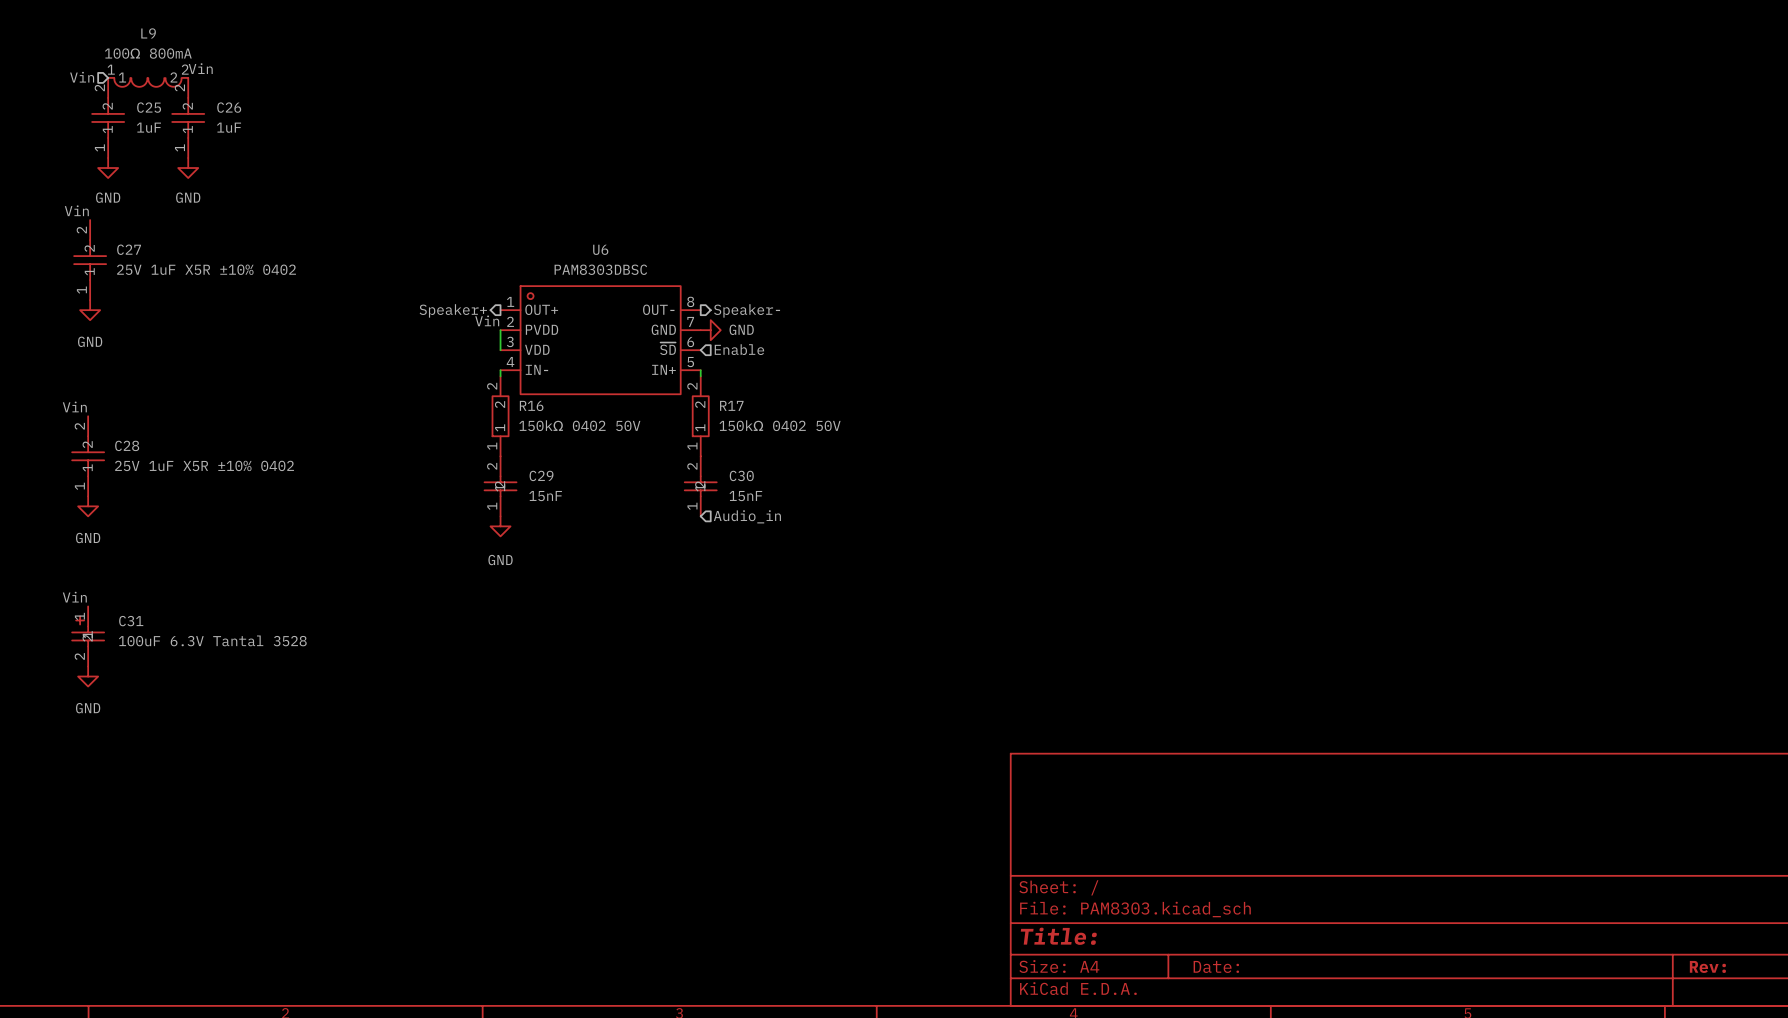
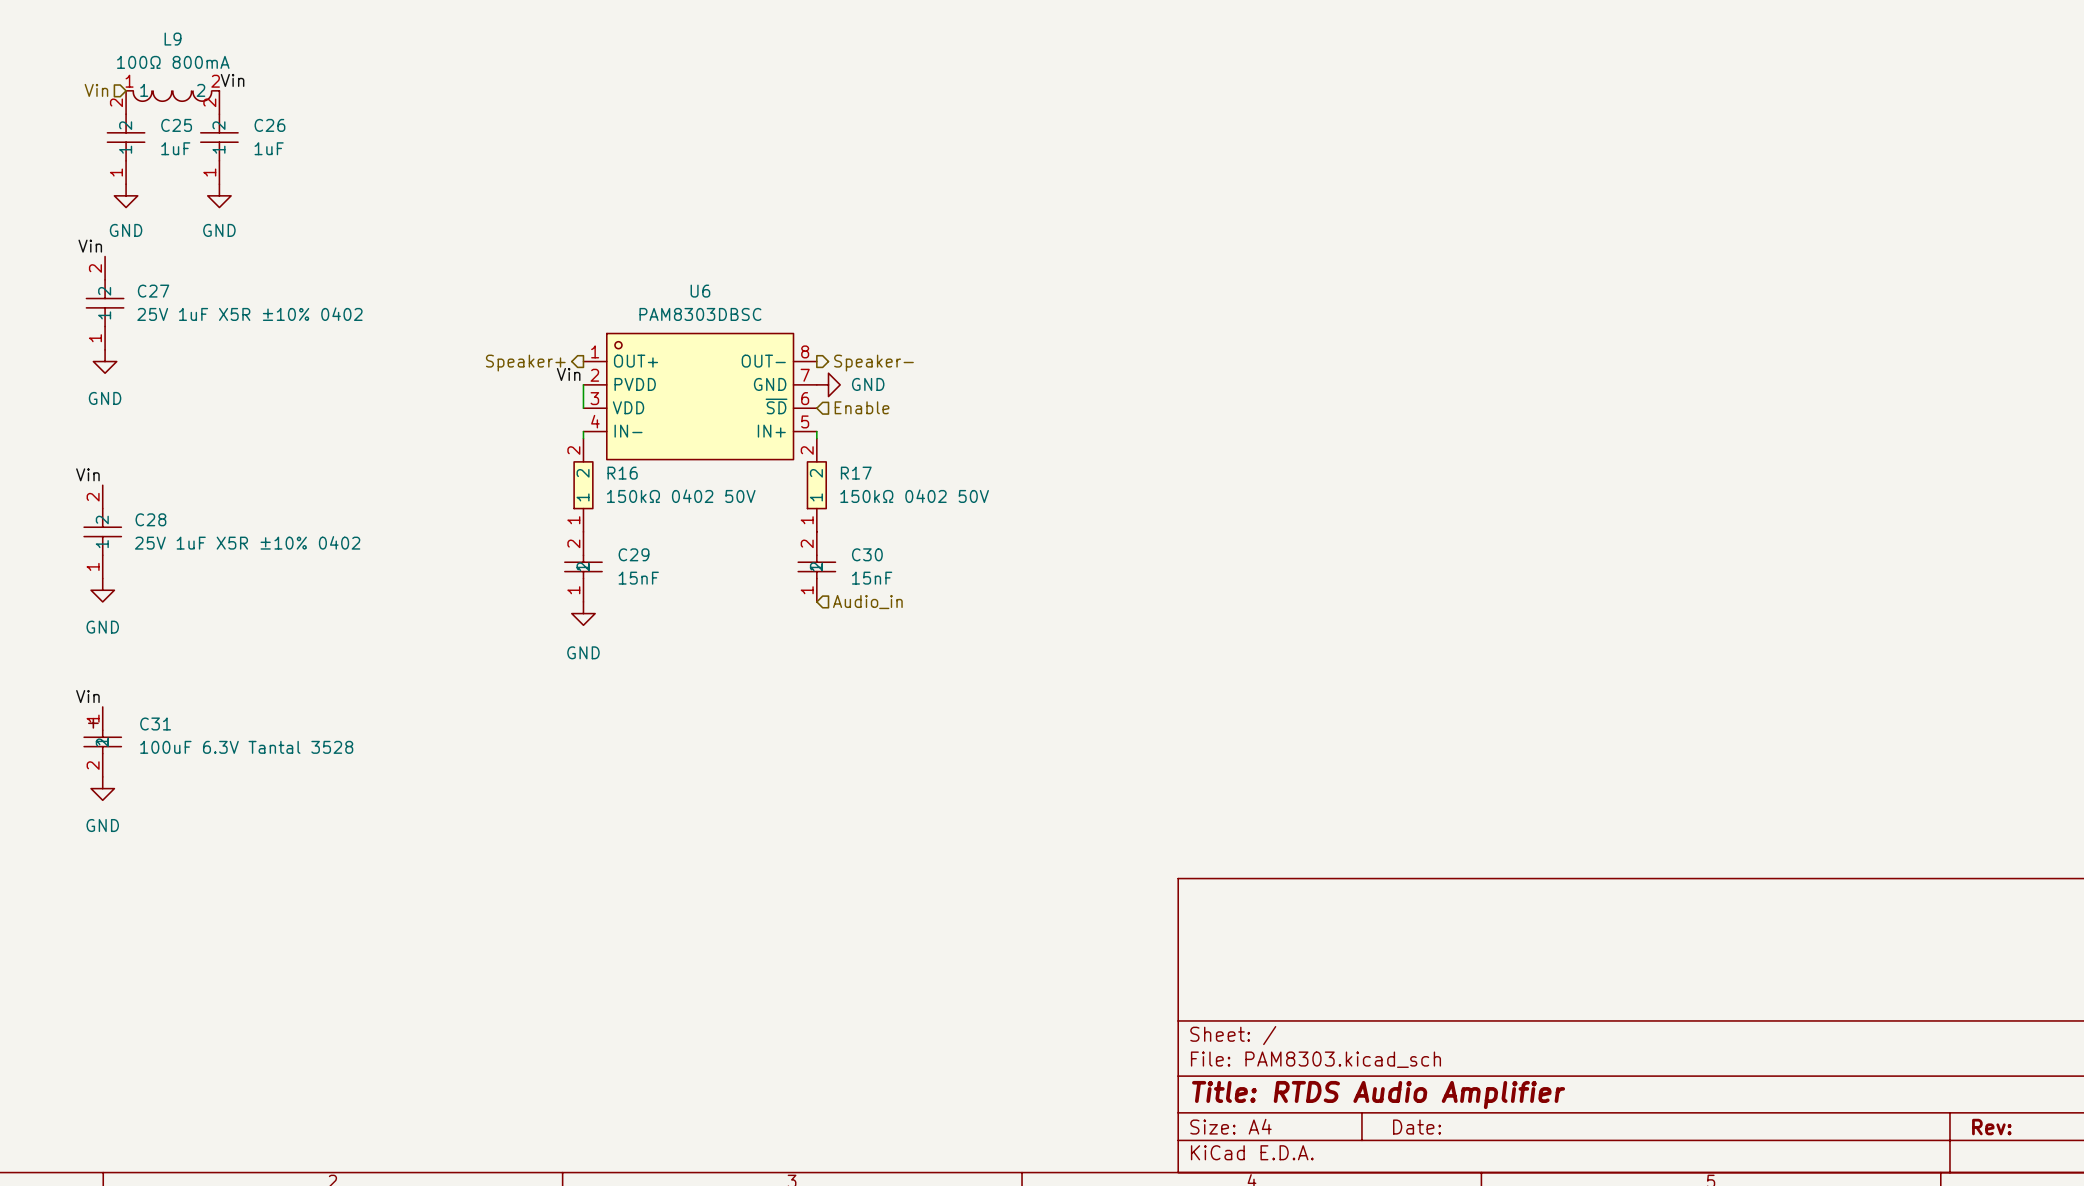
title block: Title: (1058, 936) -> Title: RTDS Audio Amplifier (1378, 1095)

